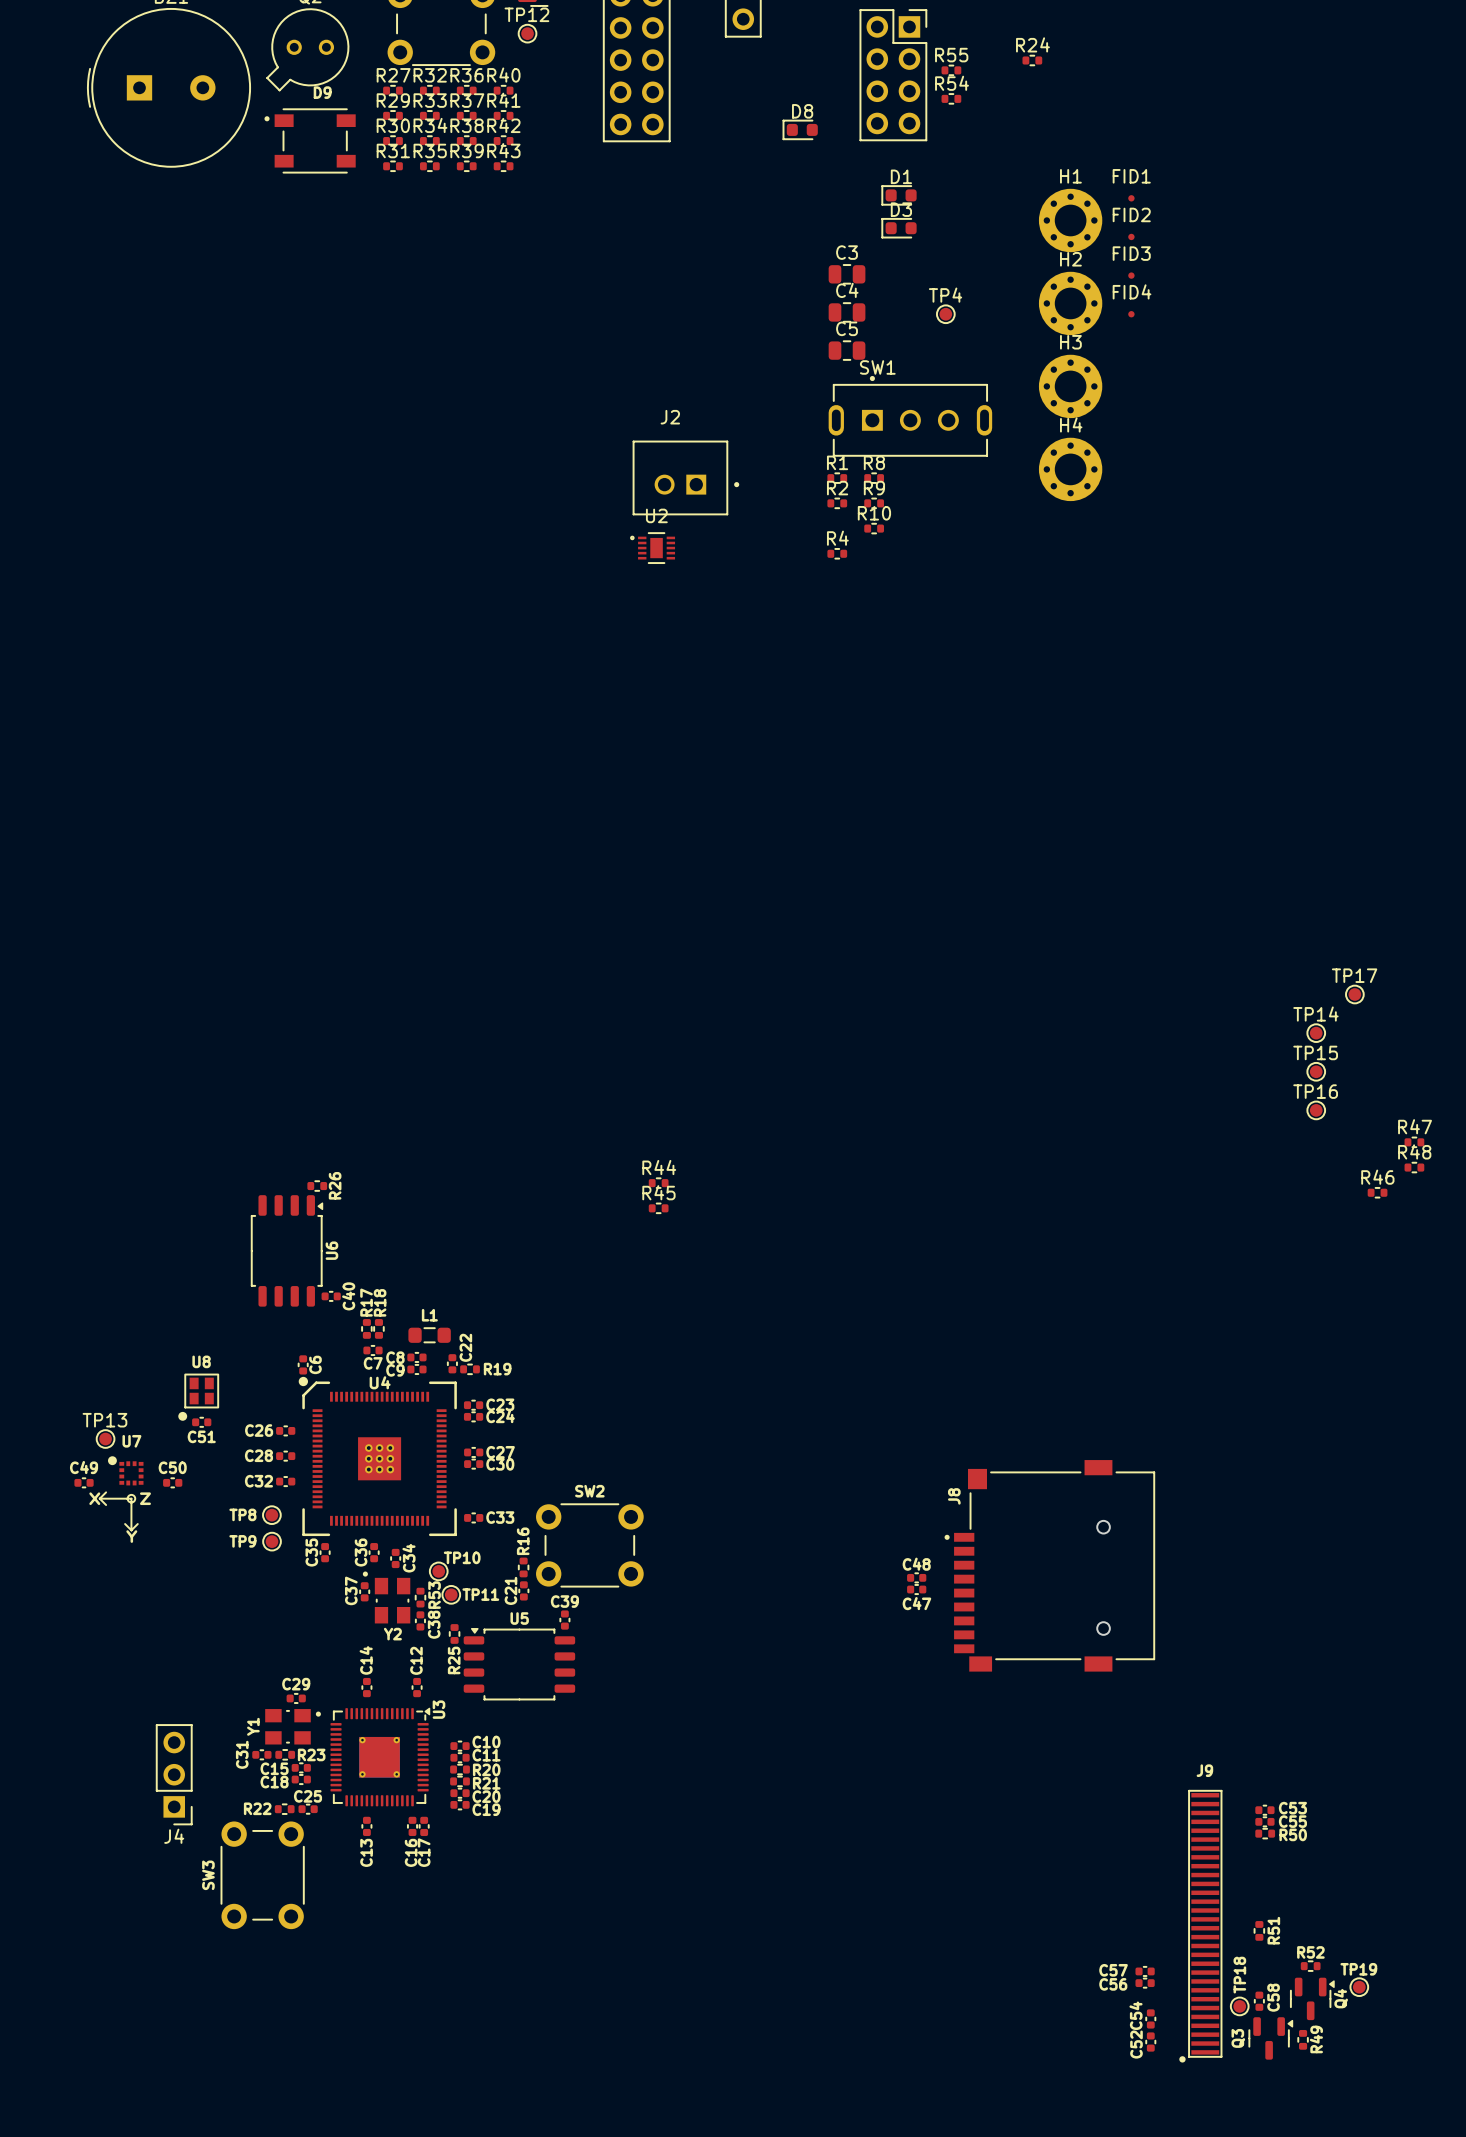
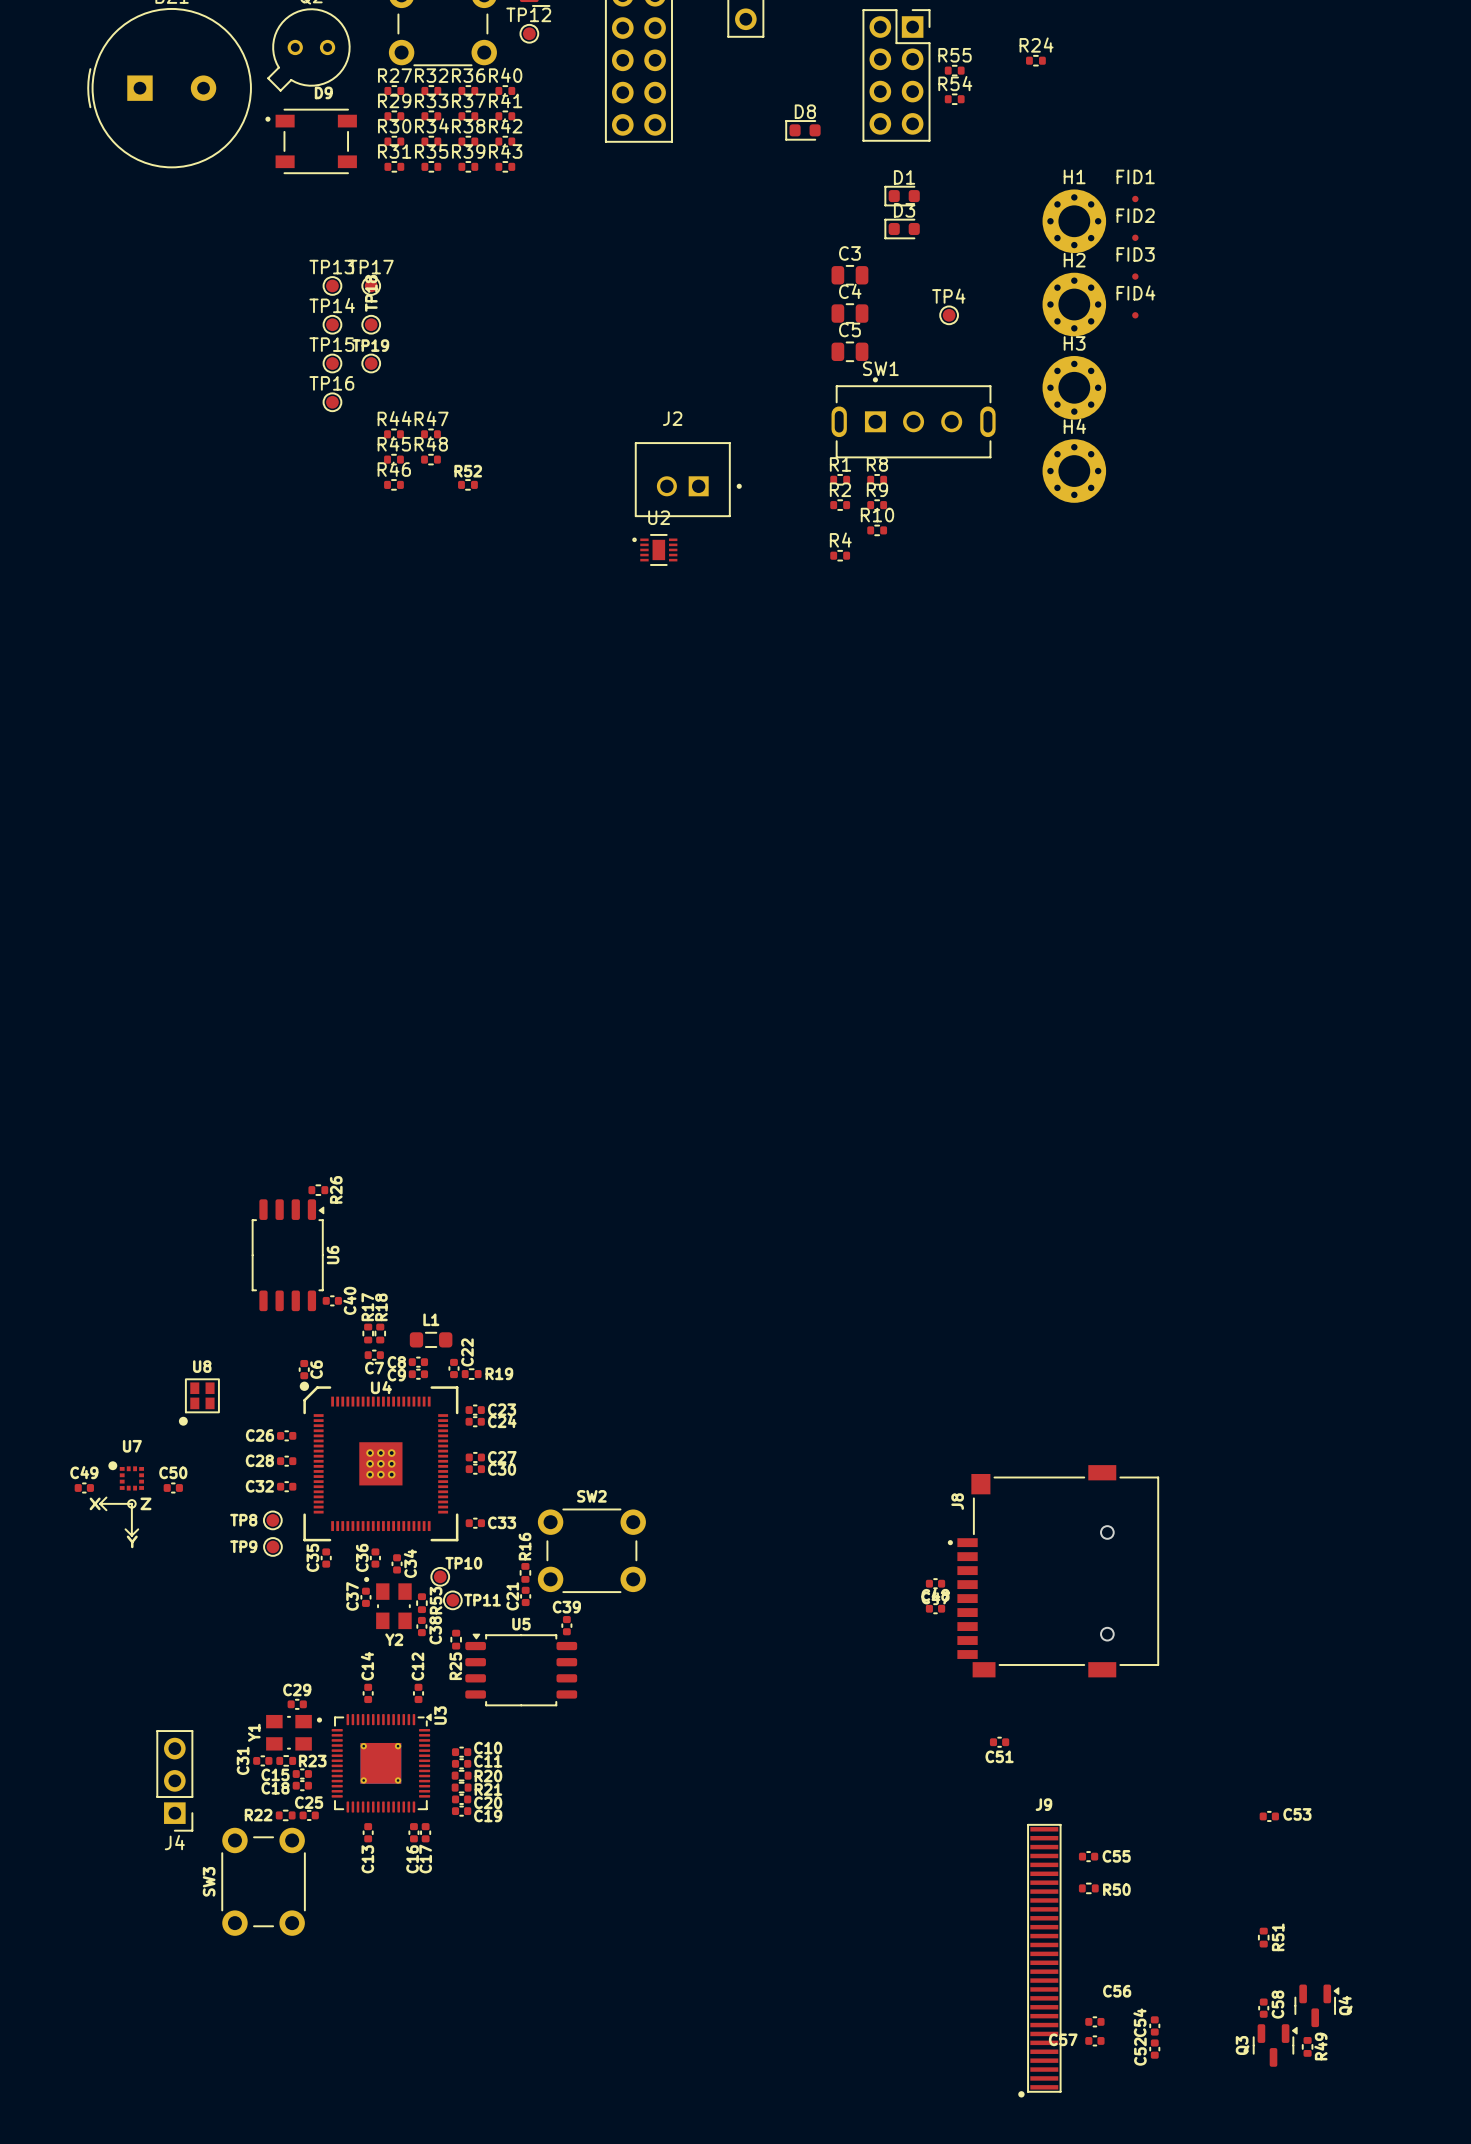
TP17 position: (1354, 994) -> (371, 285)
TP14 position: (1316, 1033) -> (332, 324)
TP15 position: (1316, 1071) -> (332, 363)
TP16 position: (1316, 1110) -> (332, 402)
R47 position: (1414, 1142) -> (430, 434)
R48 position: (1414, 1167) -> (430, 459)
R44 position: (658, 1183) -> (393, 434)
R46 position: (1377, 1192) -> (393, 484)
R45 position: (658, 1208) -> (393, 459)
C51 position: (201, 1422) -> (999, 1742)
TP13 position: (105, 1439) -> (332, 285)
C48 position: (916, 1577) -> (935, 1608)
C47 position: (916, 1589) -> (935, 1583)
C55 position: (1264, 1821) -> (1088, 1856)
R50 position: (1265, 1833) -> (1088, 1888)
J9 position: (1200, 1926) -> (1039, 1960)
R52 position: (1310, 1966) -> (467, 484)
C57 position: (1145, 1971) -> (1094, 2040)
C56 position: (1145, 1983) -> (1094, 2021)
TP19 position: (1359, 1987) -> (371, 363)
TP18 position: (1239, 2006) -> (371, 324)

